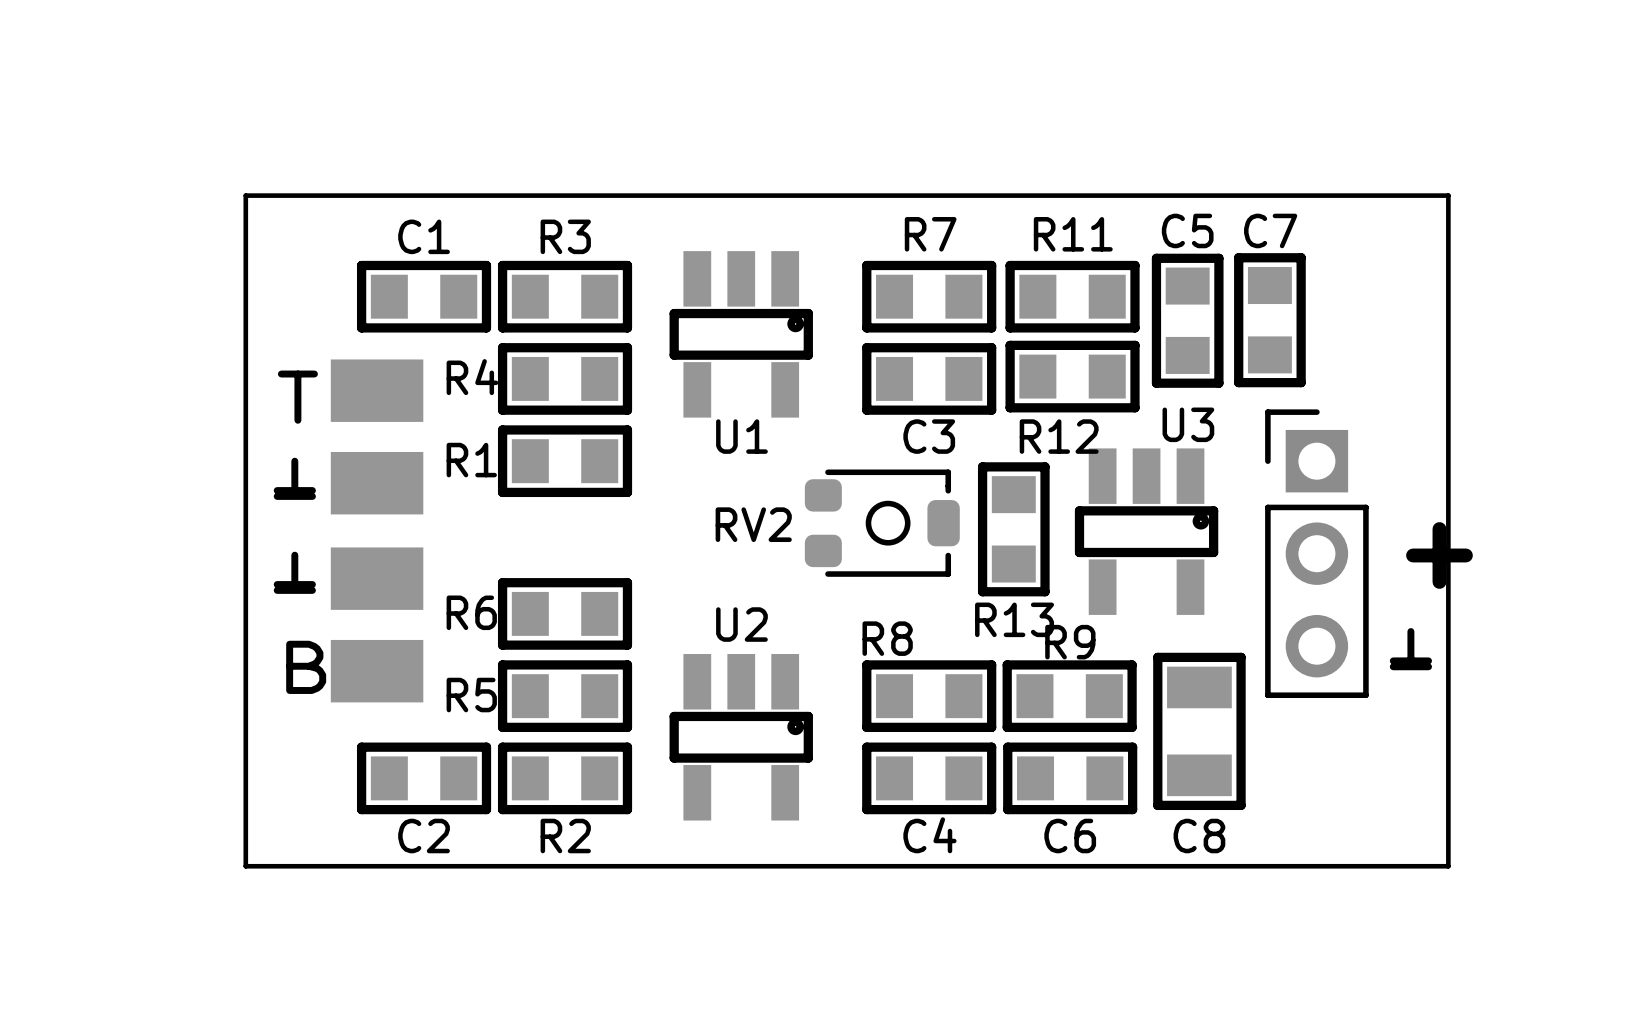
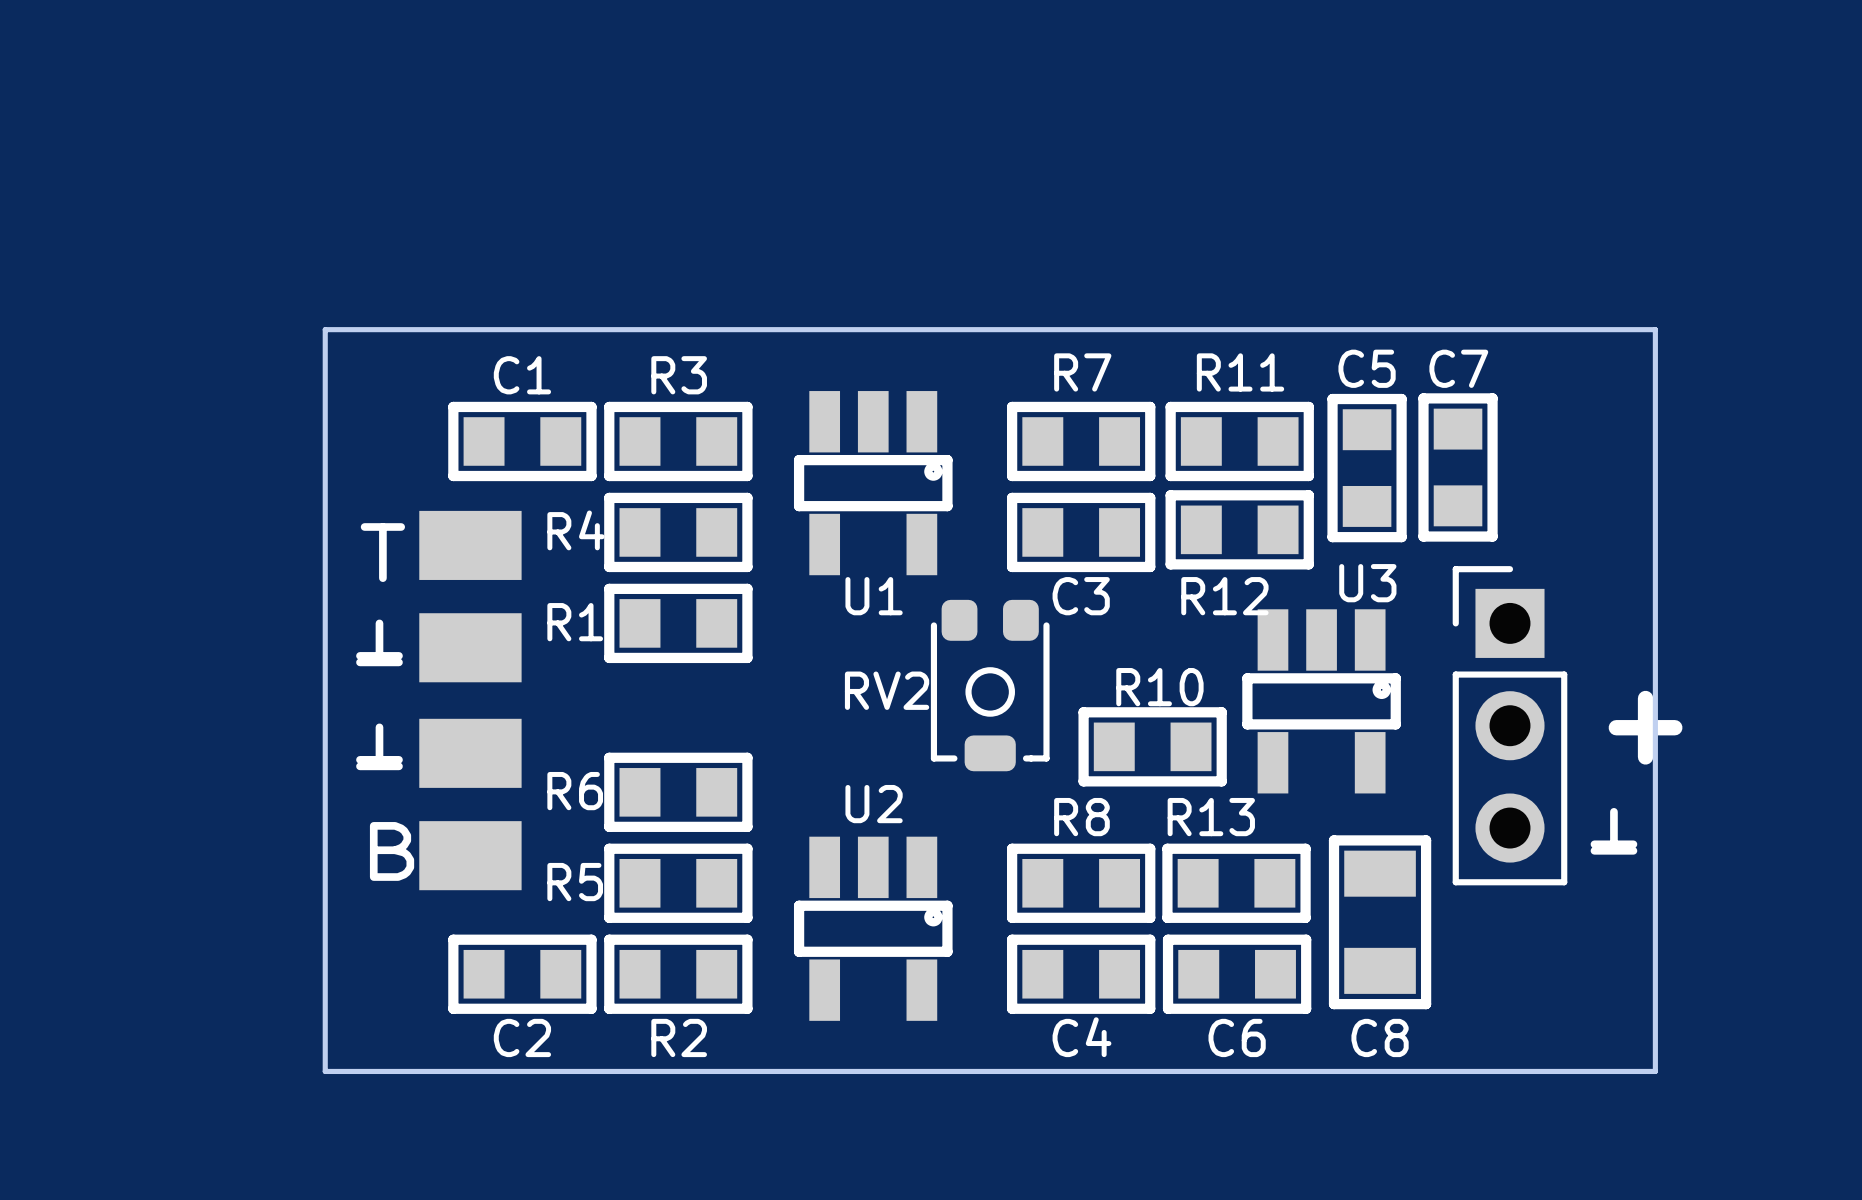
RV2 rotation: 0° (882, 523) -> 90° clockwise (990, 685)
R13: (1013, 529) -> none
R10: none -> (1152, 746)
R8 name position: R8 (887, 638) -> R8 (1081, 817)
R9 name: R9 (1070, 642) -> R13 (1211, 817)

